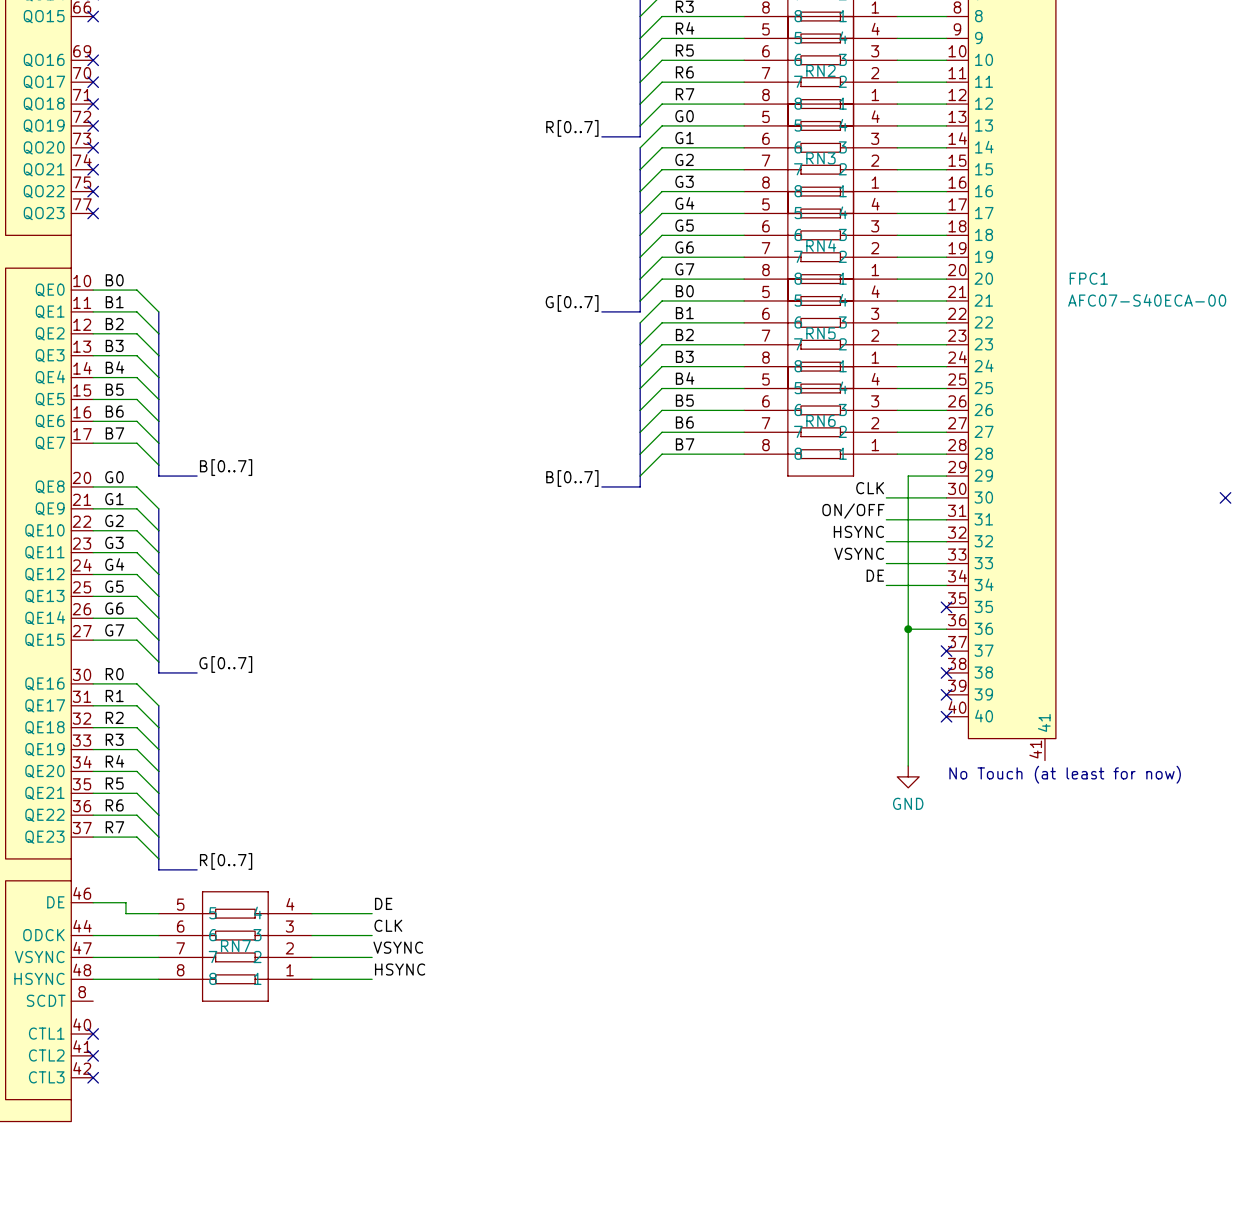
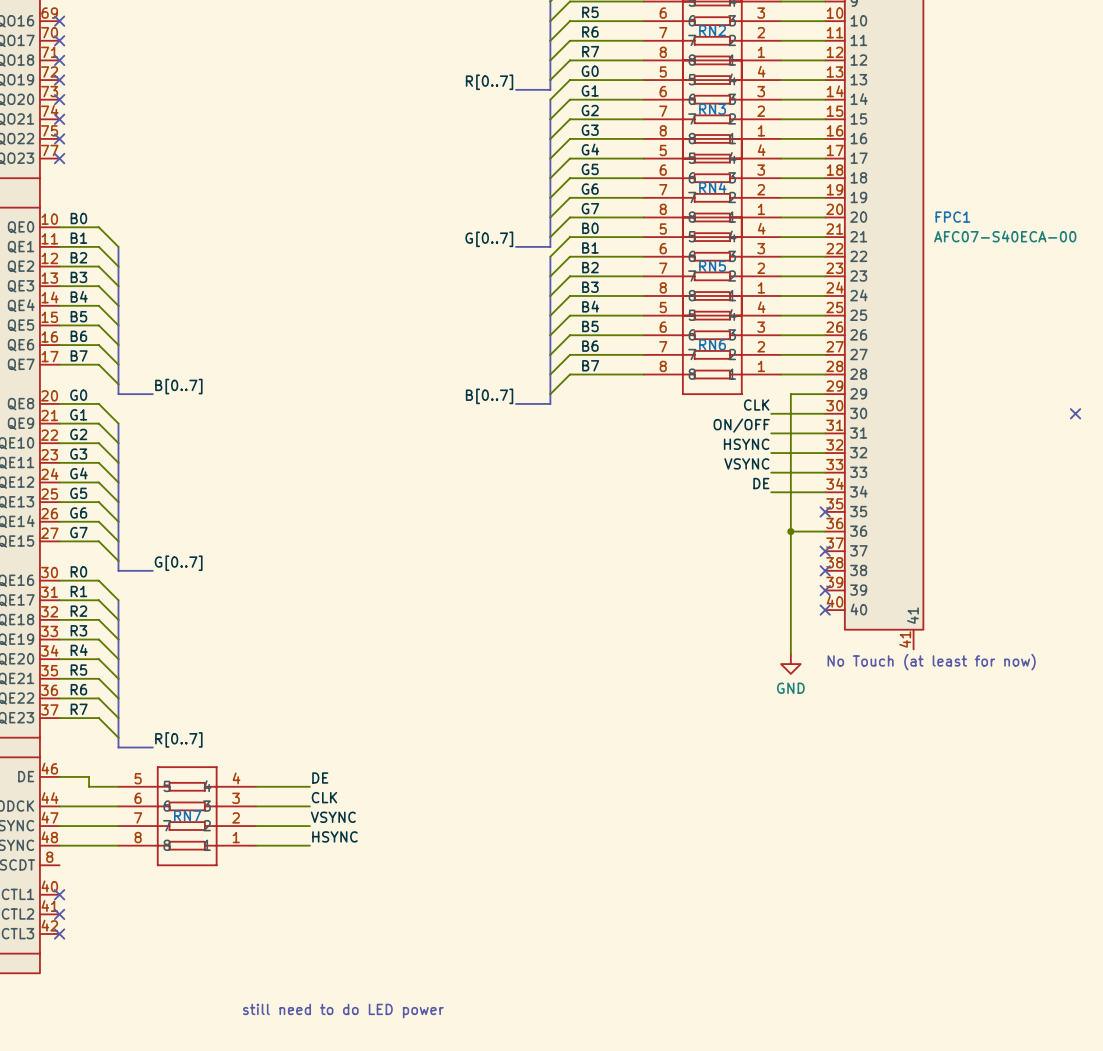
text: none -> still need to do LED power (343, 1011)

